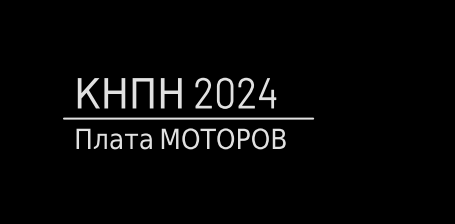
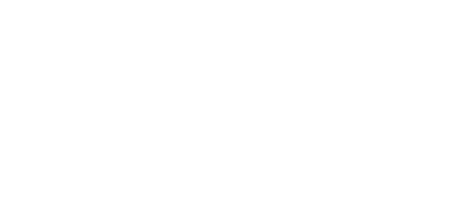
drawing: [62, 117, 315, 120] -> none

